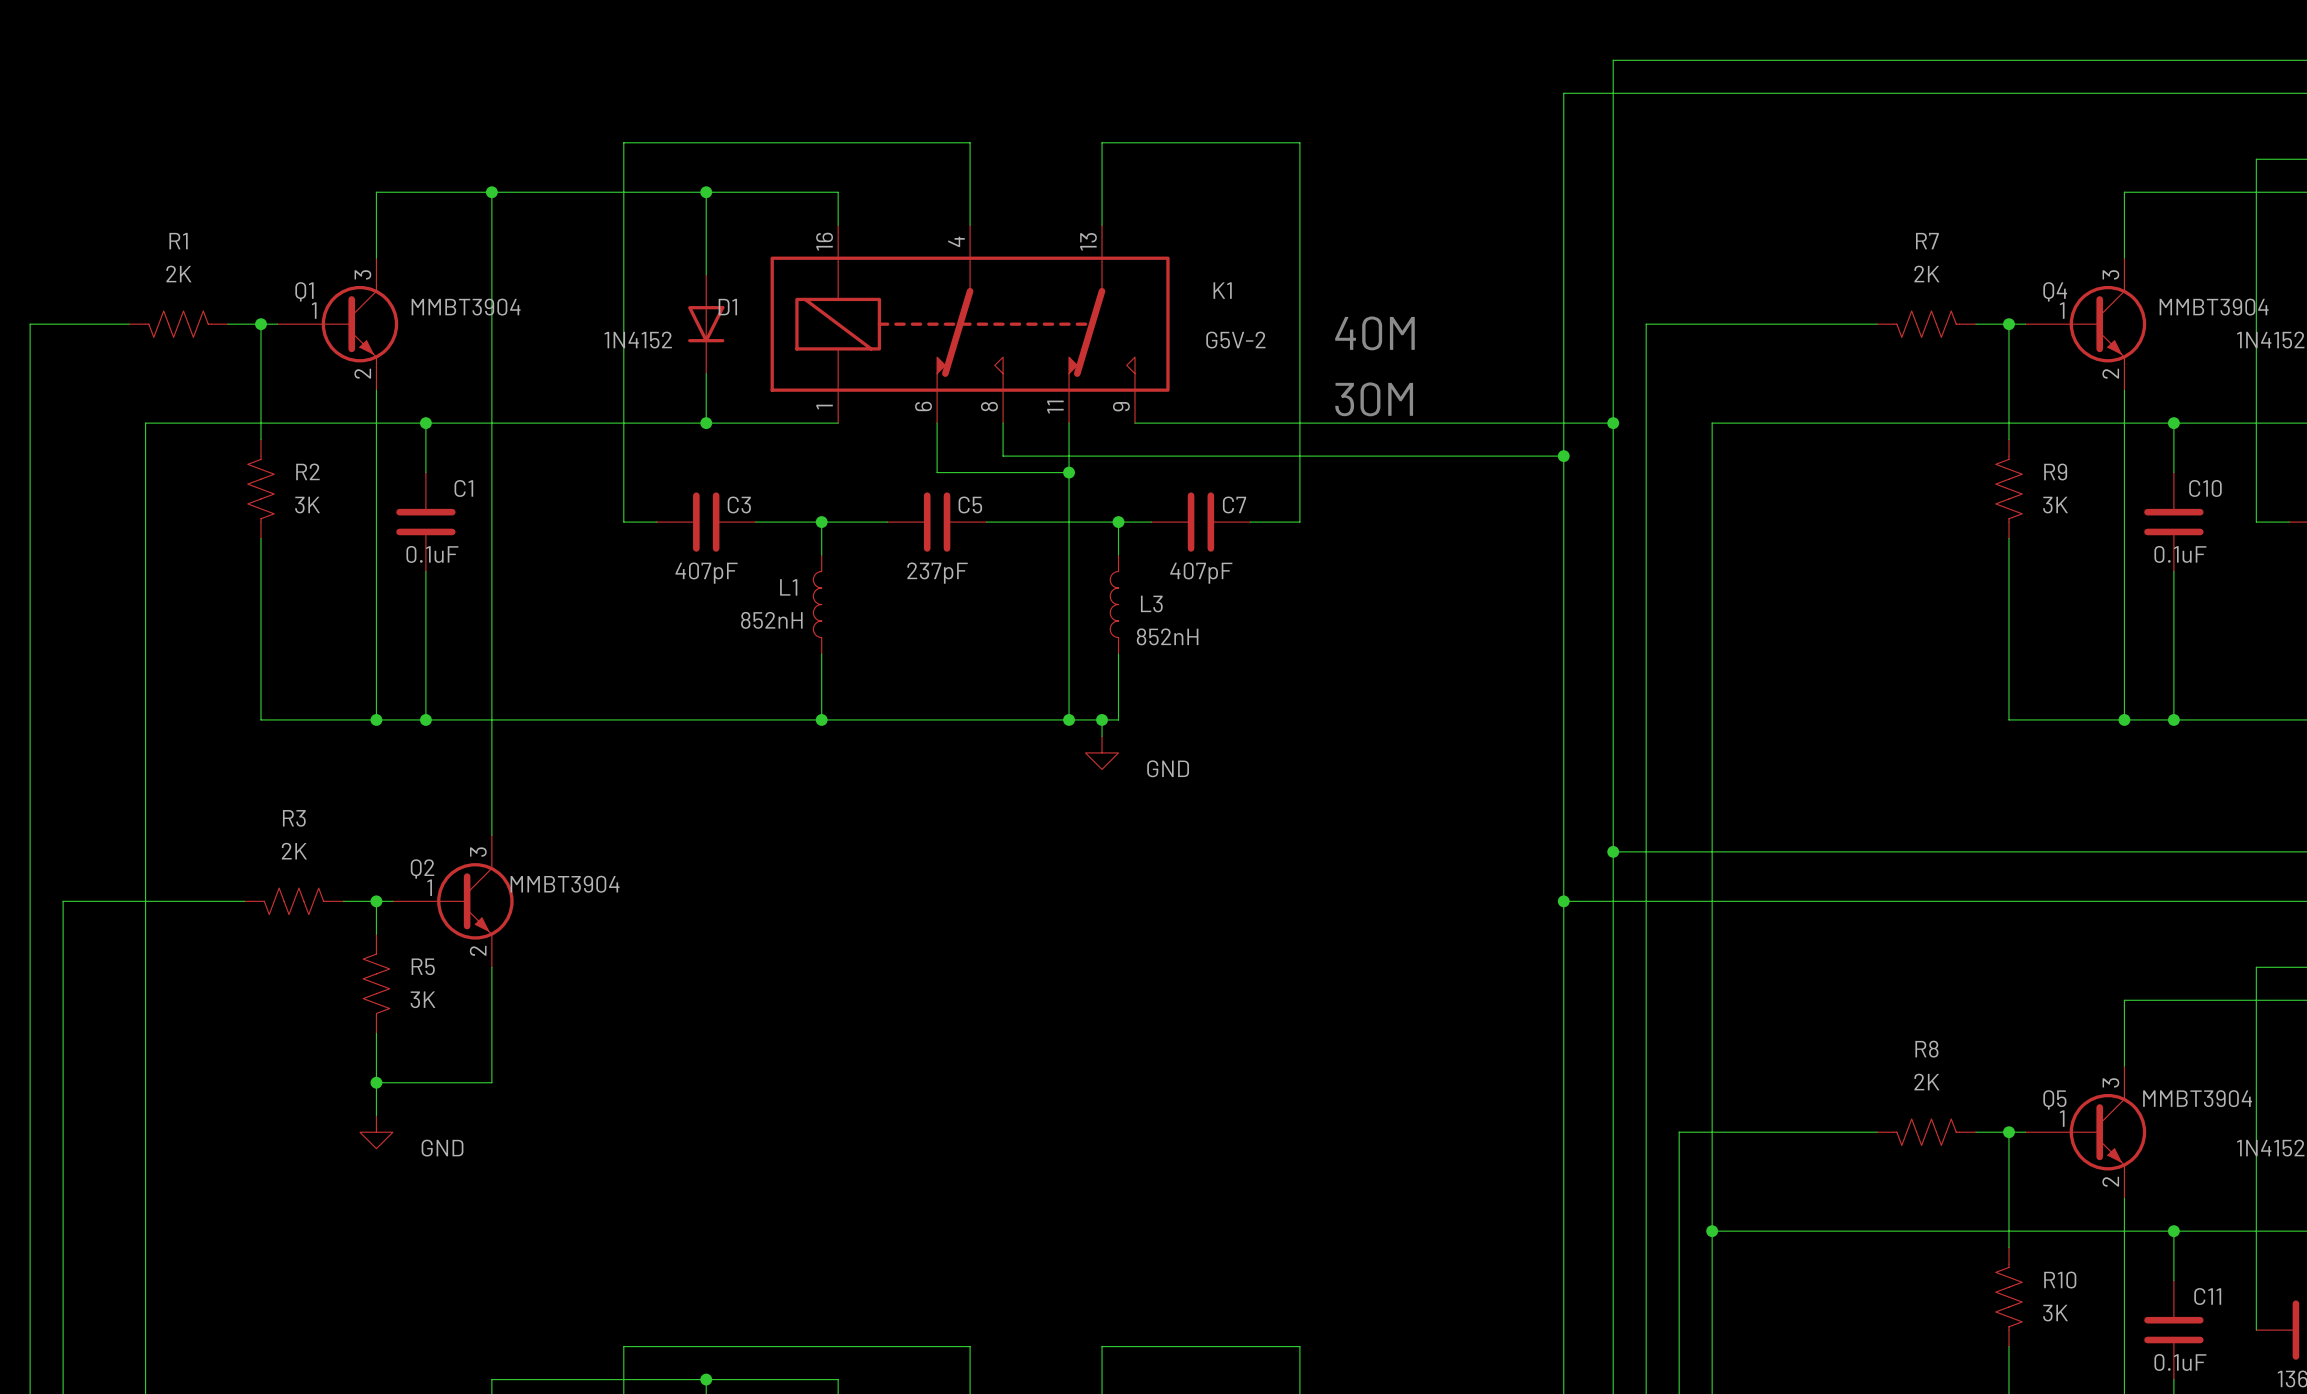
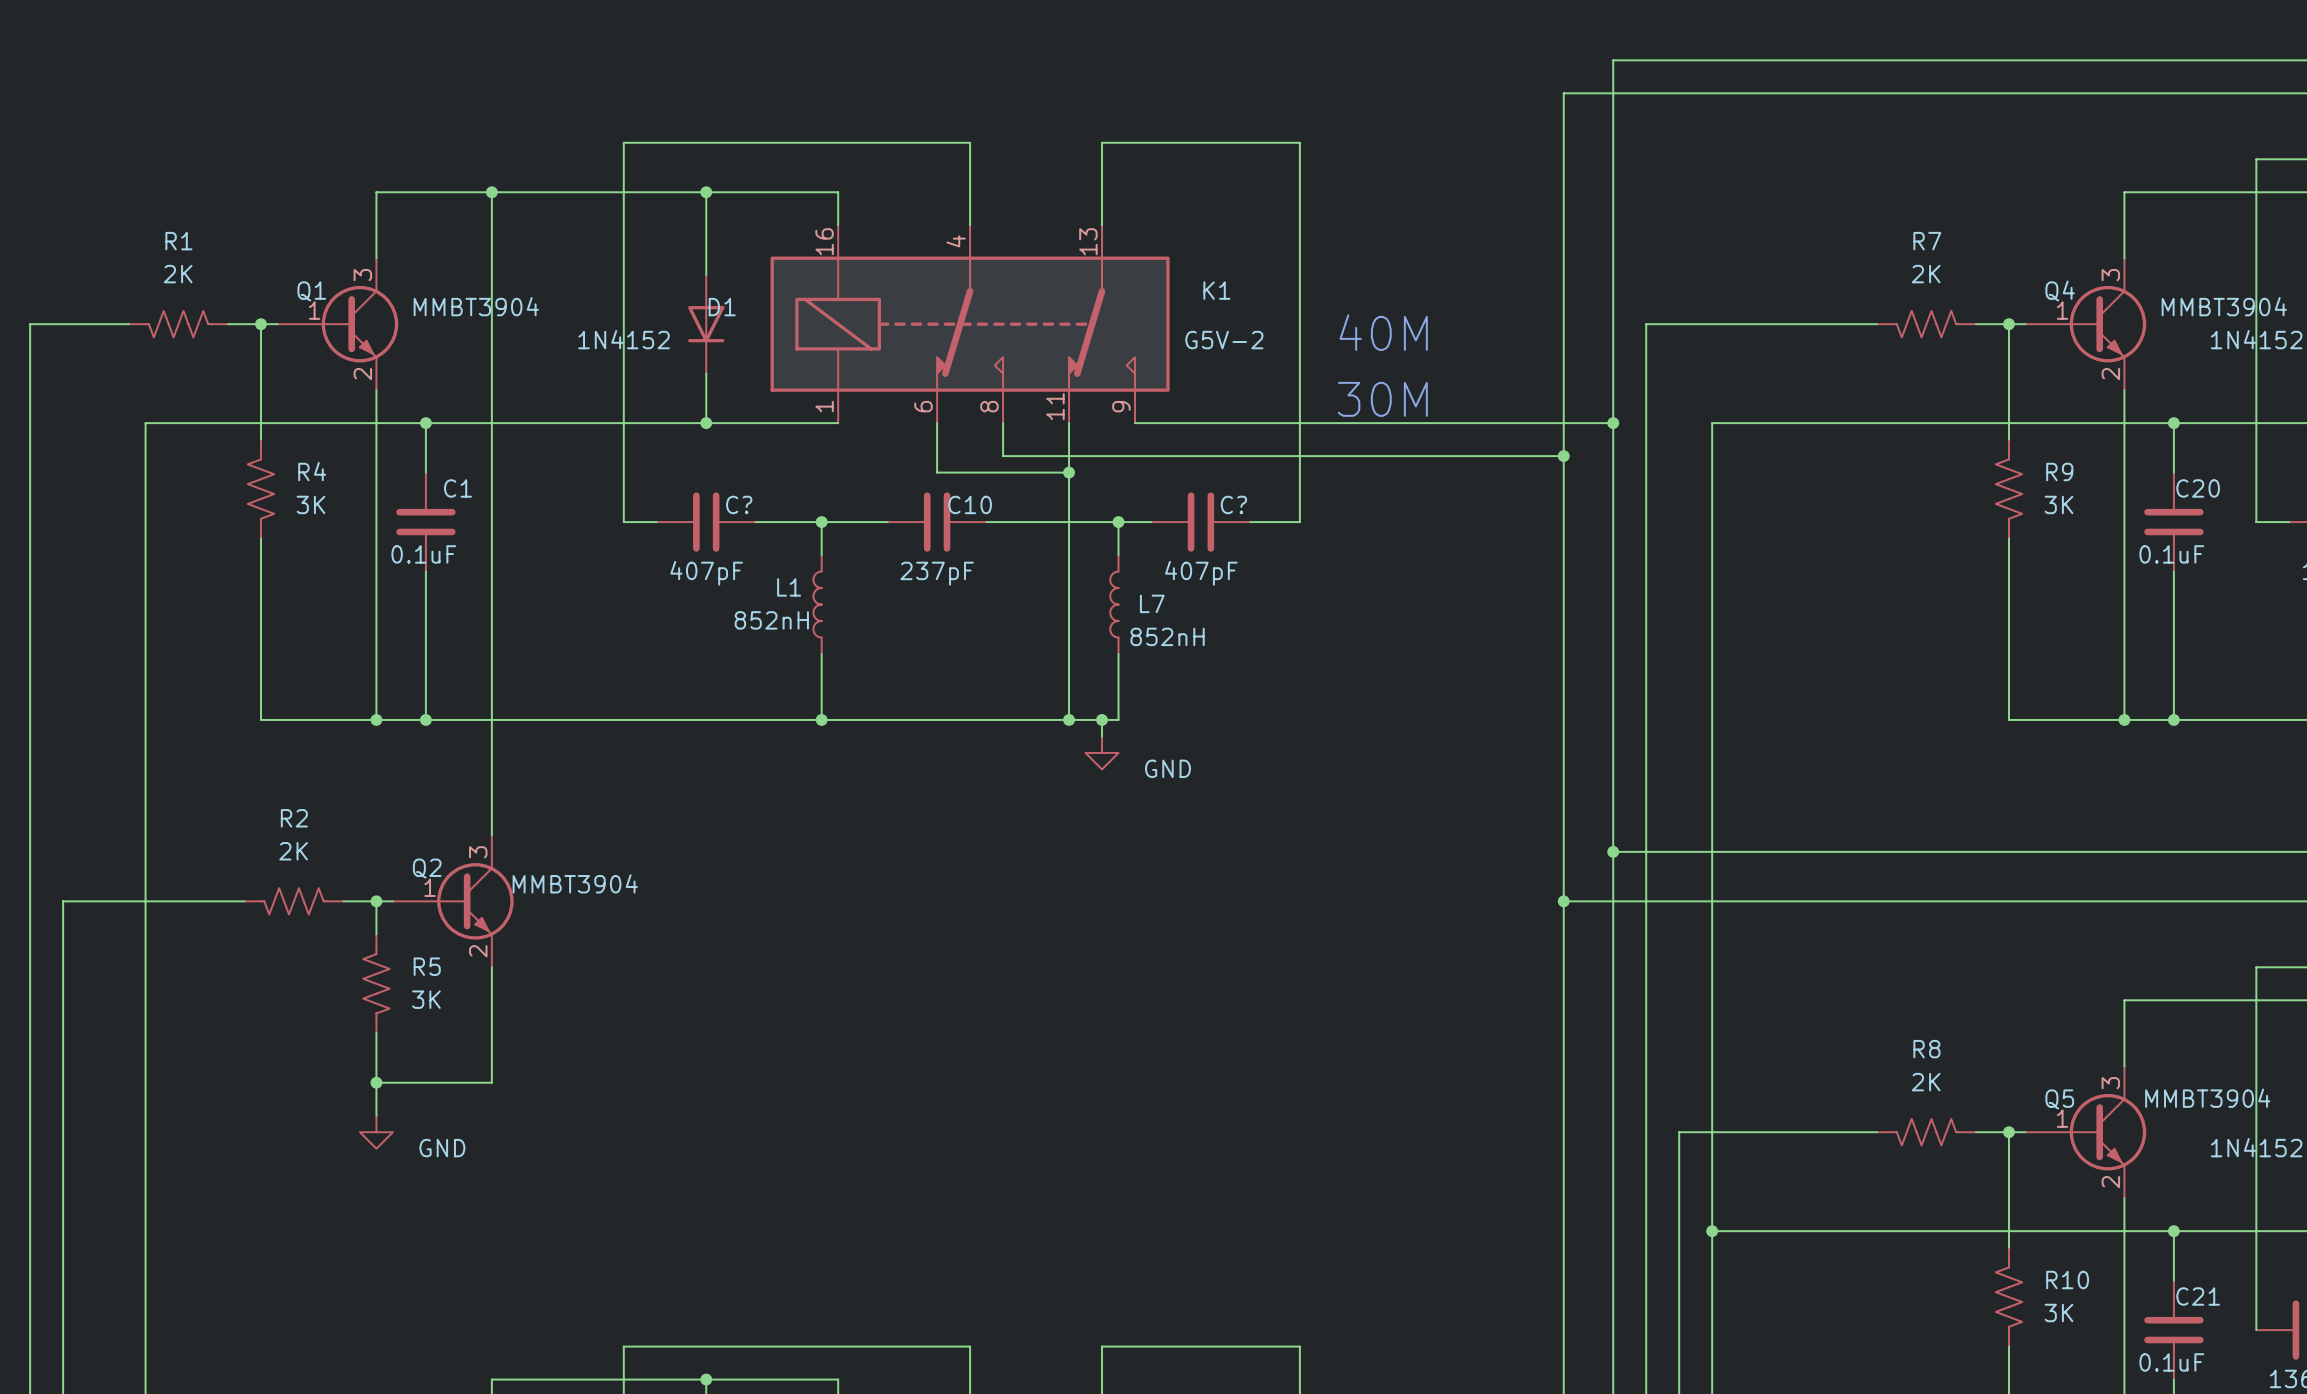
R2 name: R2 (307, 471) -> R4 (312, 471)
C10 name: C10 (2205, 488) -> C20 (2198, 488)
C3 name: C3 (739, 504) -> C? (739, 504)
C5 name: C5 (970, 504) -> C10 (970, 504)
C7 name: C7 (1234, 504) -> C? (1233, 504)
L3 name: L3 (1151, 603) -> L7 (1152, 603)
R3 name: R3 (294, 818) -> R2 (294, 818)
C11 name: C11 (2207, 1296) -> C21 (2198, 1296)

